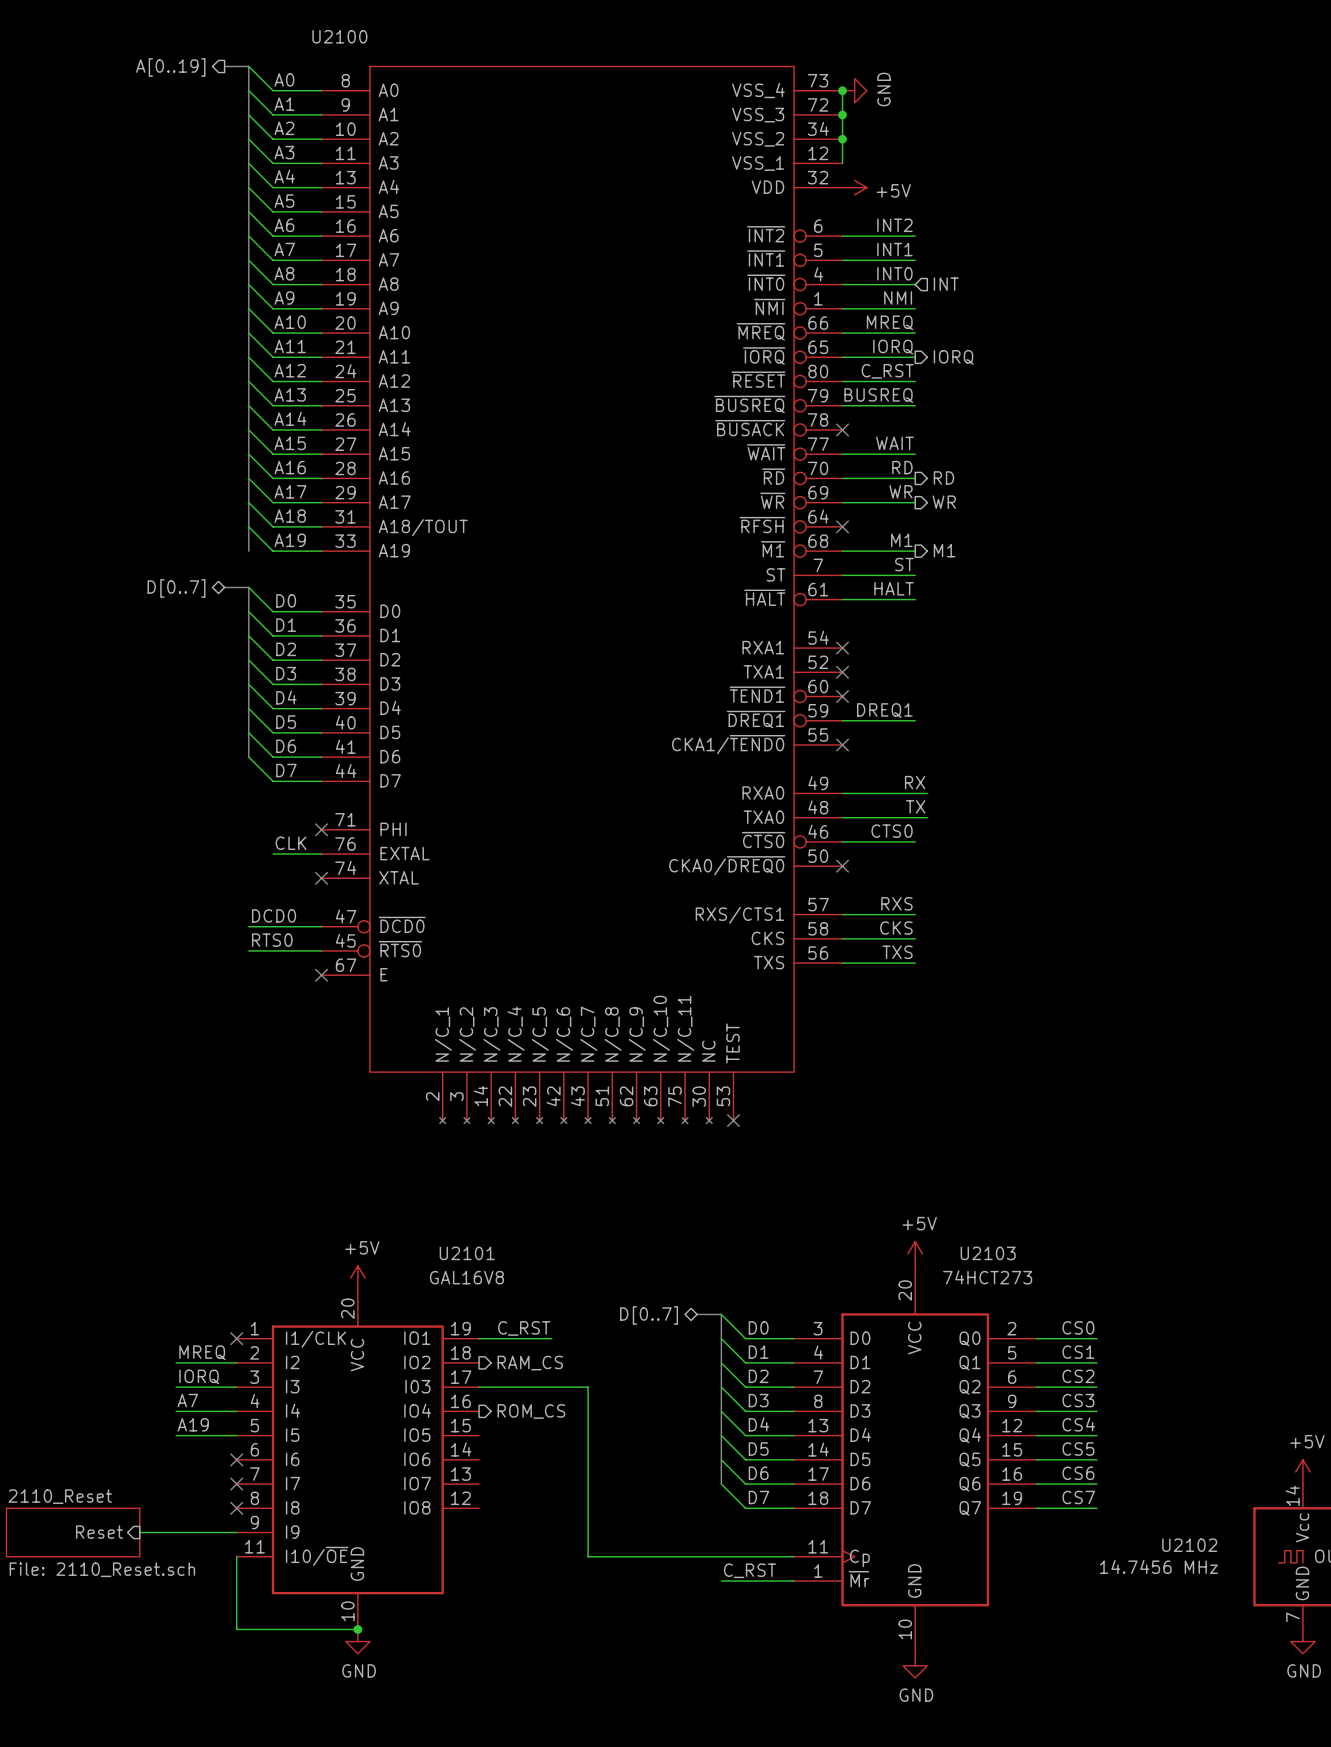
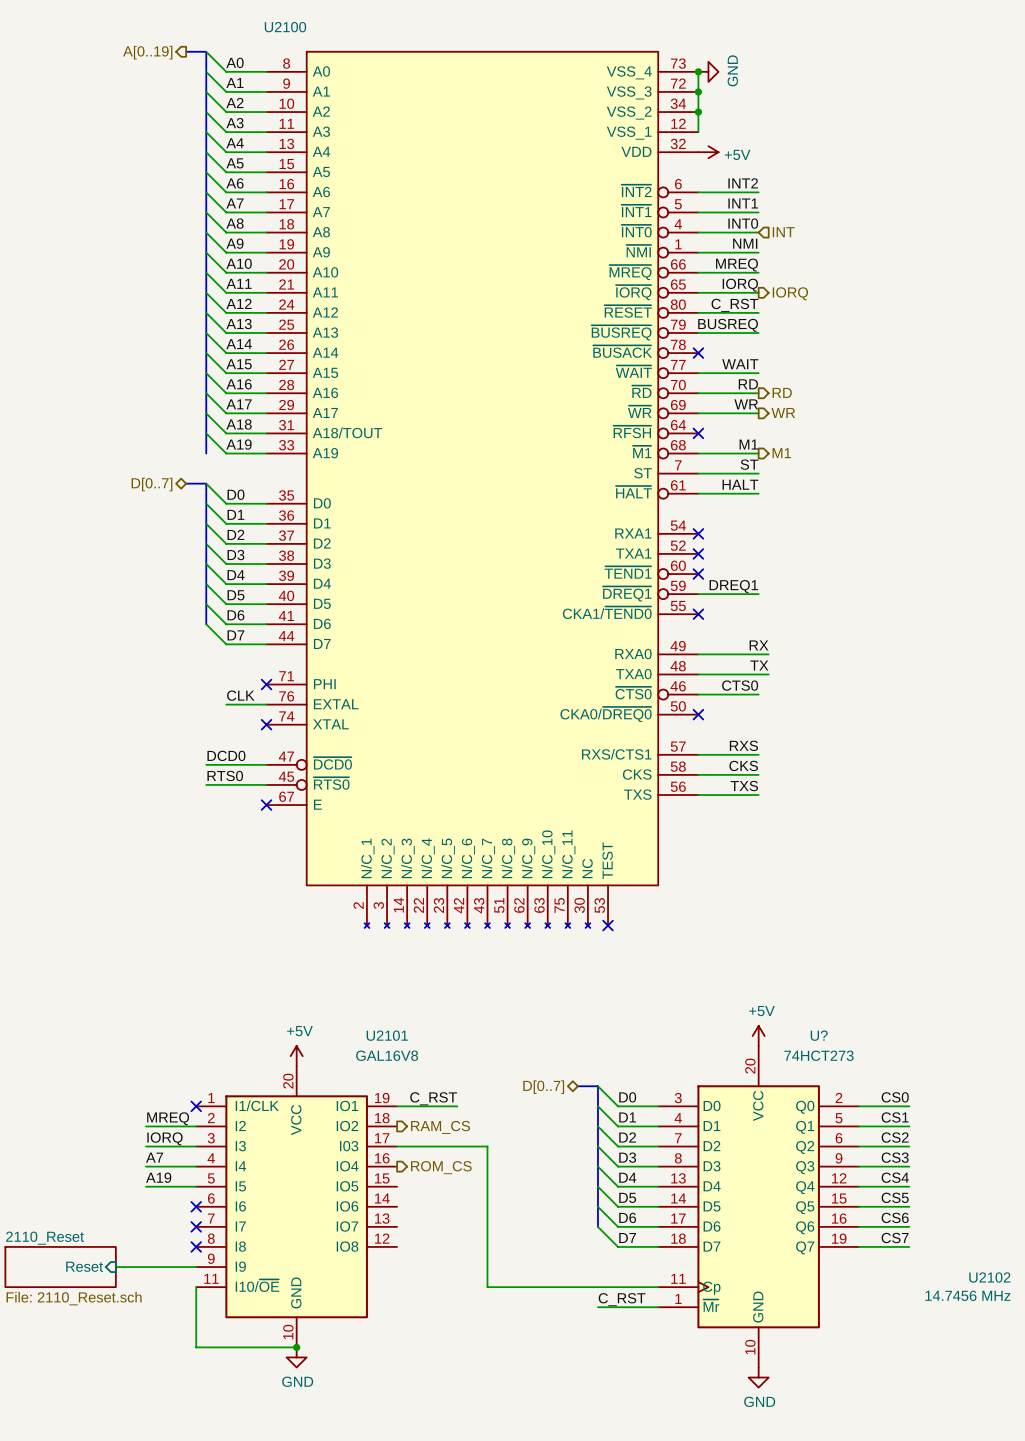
U2103 name: U2103 (988, 1253) -> U? (819, 1035)

